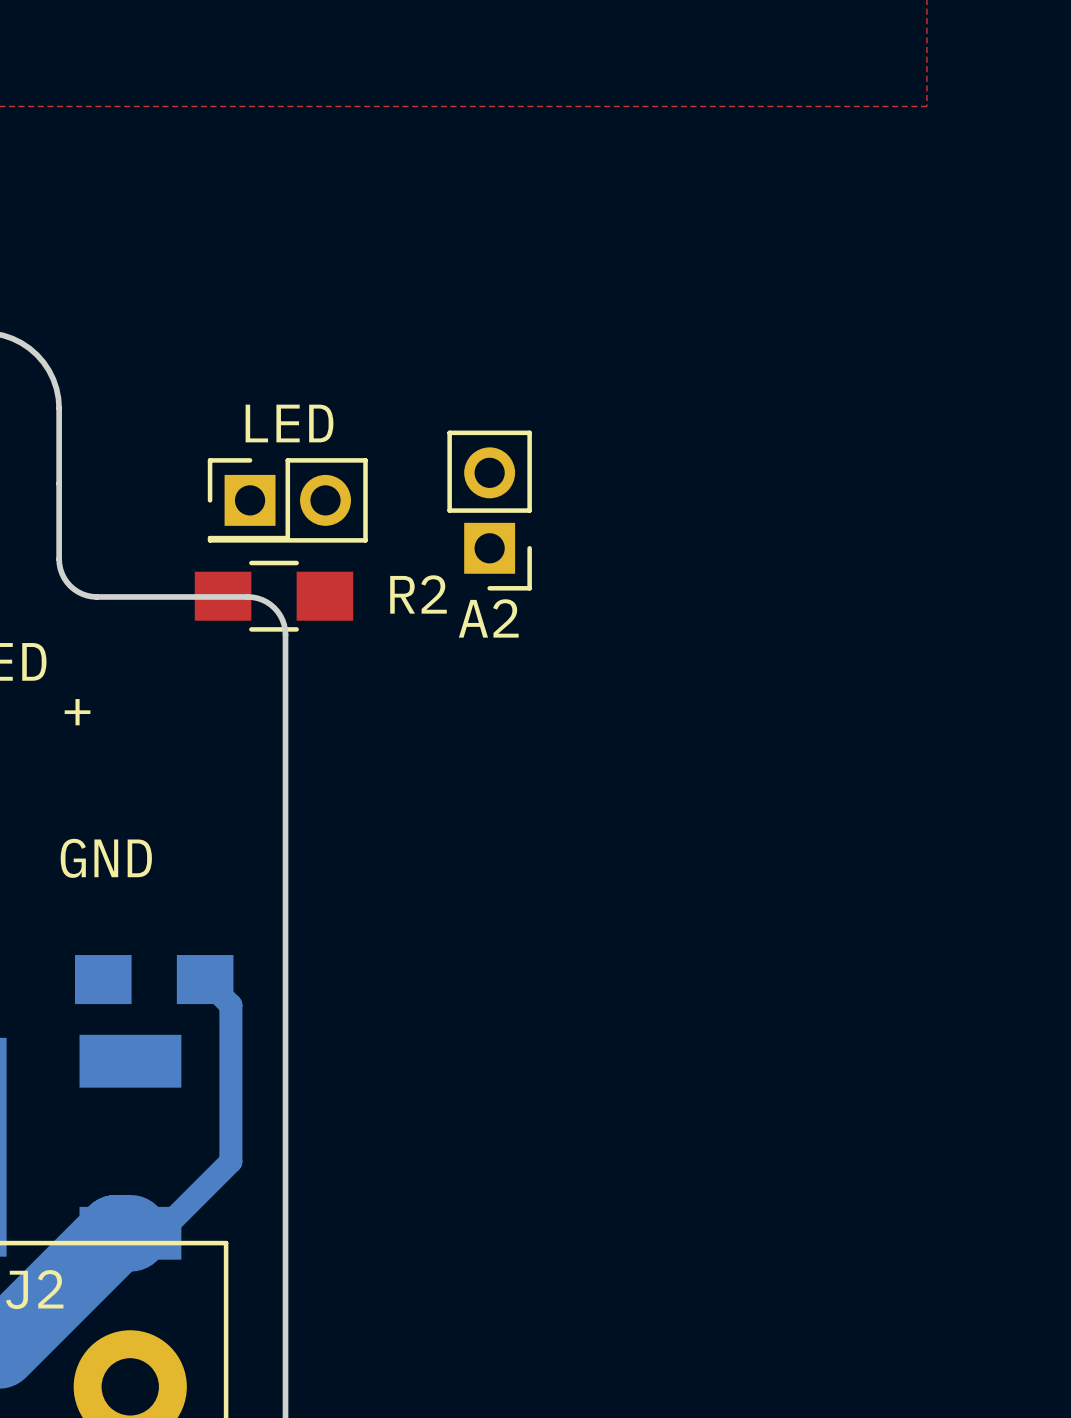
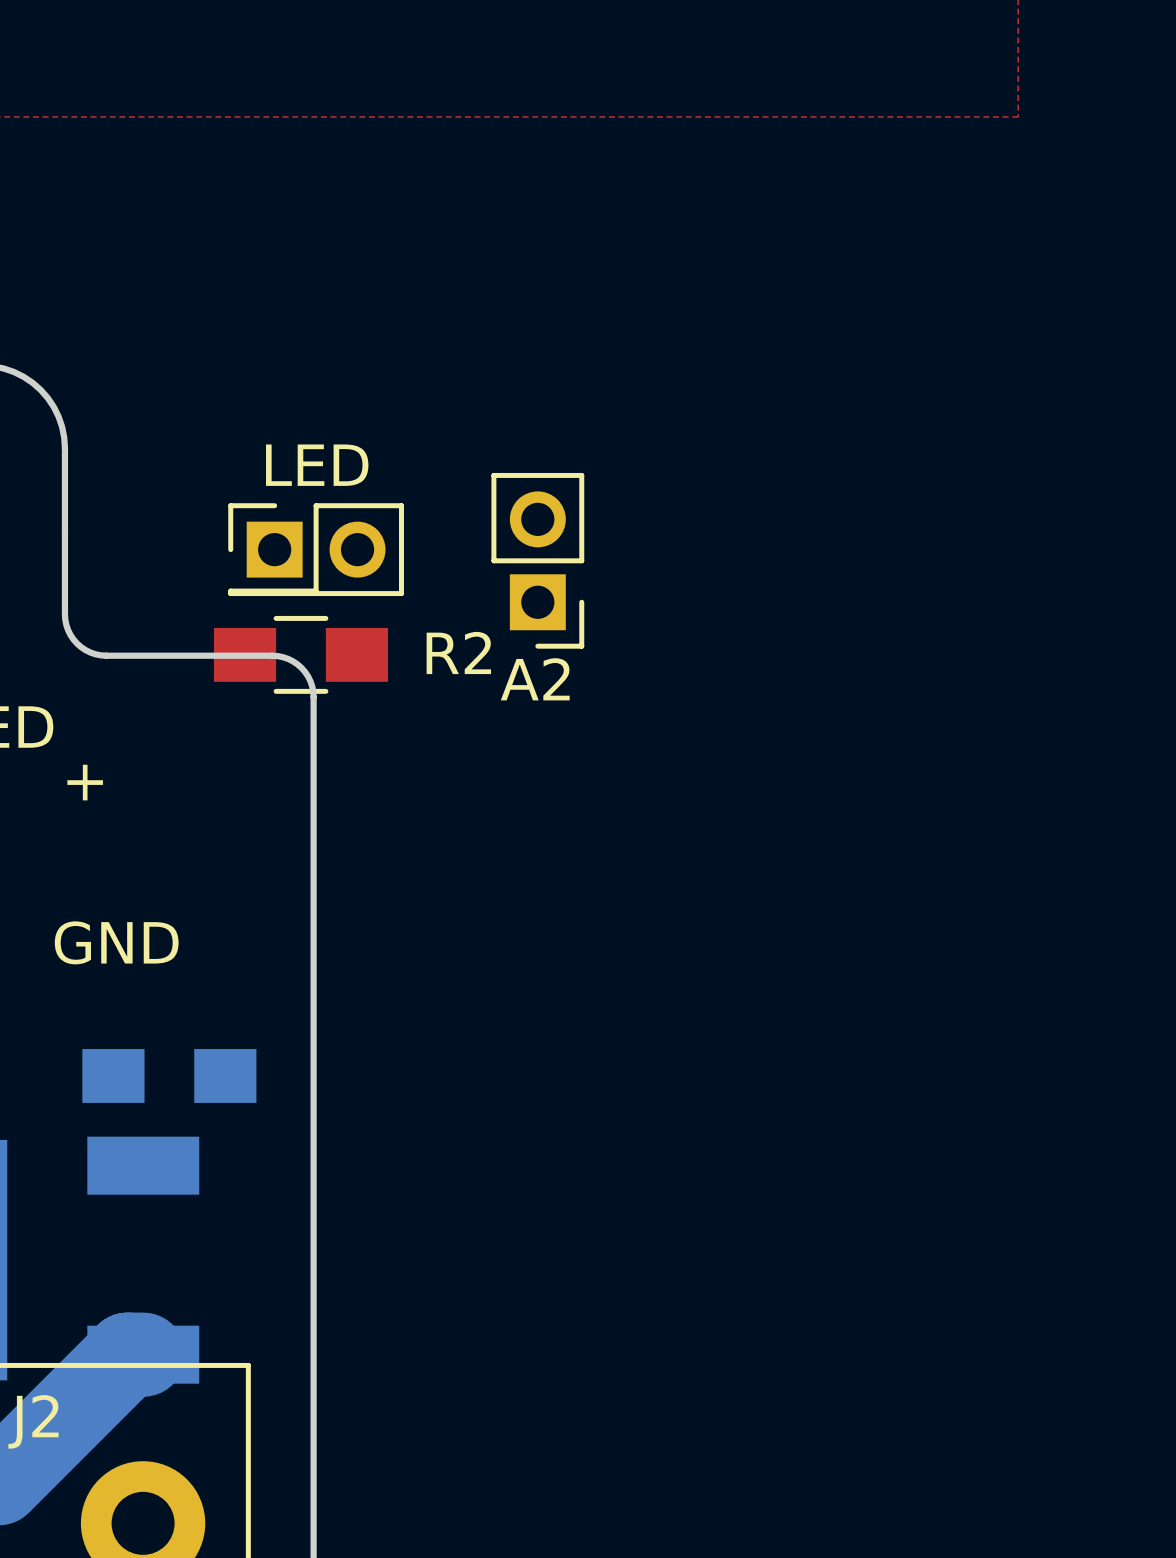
bottom track: (205, 979) (230, 1005) (230, 1161) (159, 1233) (130, 1233) -> none

